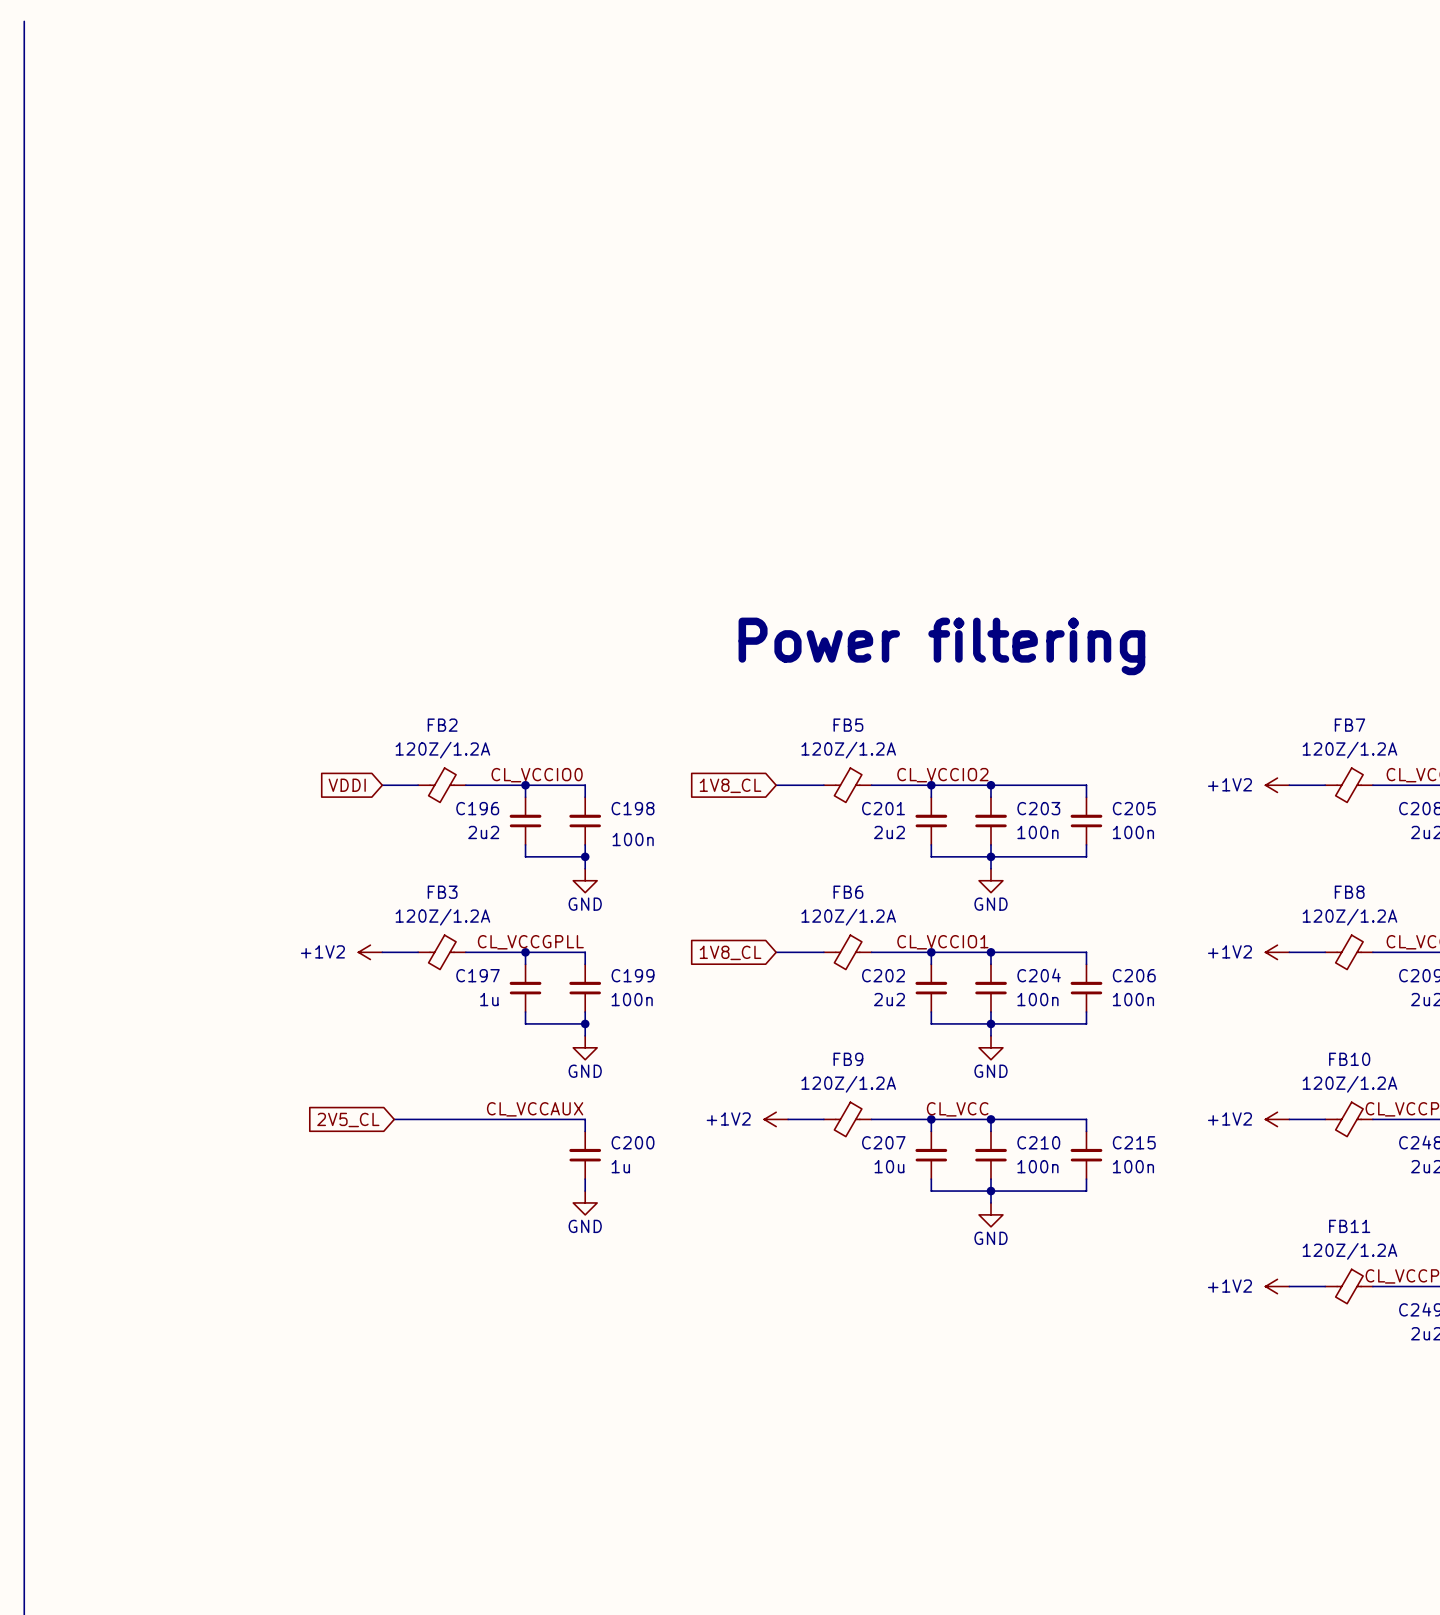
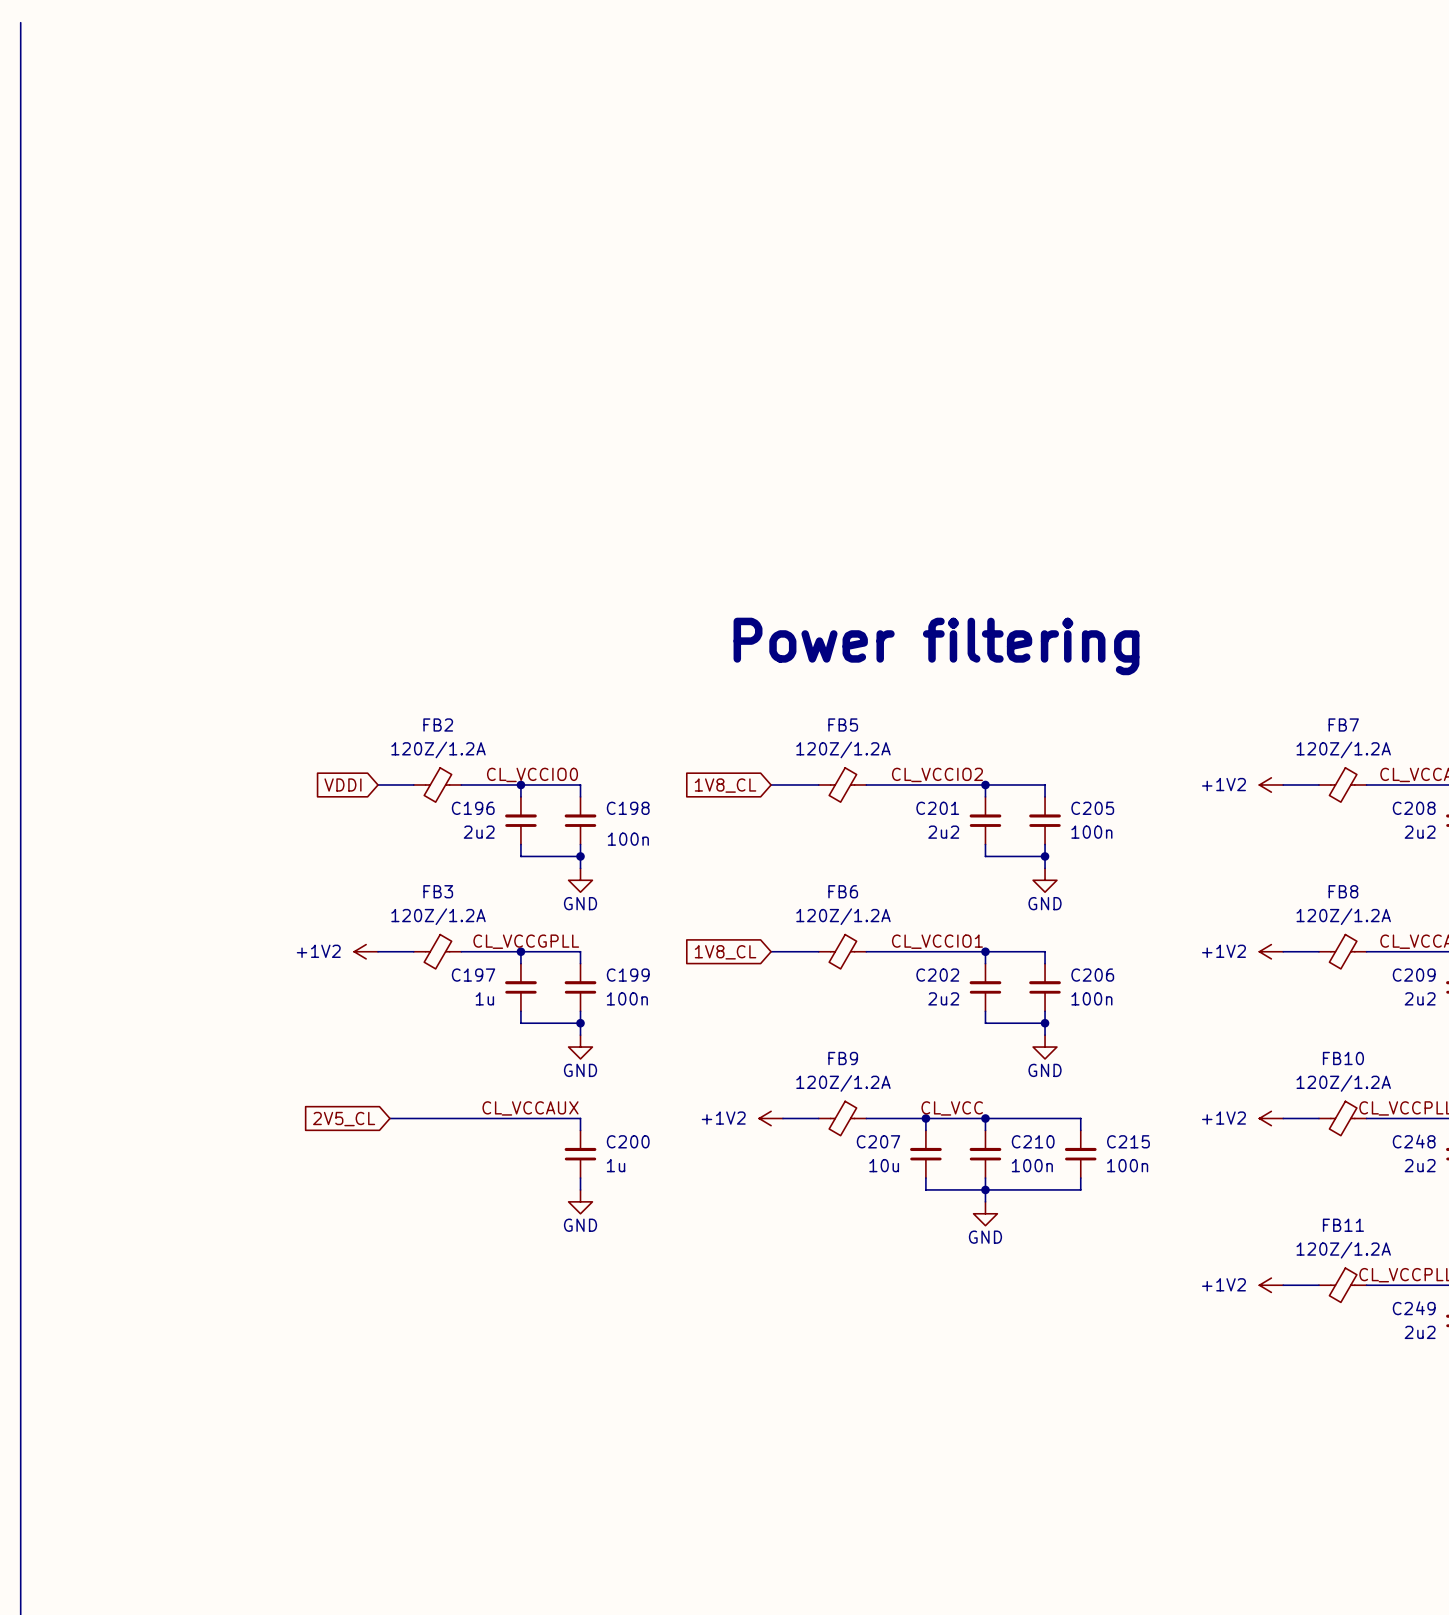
wire: (931, 785) (931, 797) -> none
junction: (931, 785) -> none
wire: (1050, 785) (1086, 785) (1086, 797) -> (1045, 784) (1045, 796)
C203 name: C203 (1038, 808) -> C201 (937, 808)
C201: (931, 821) -> none
C205 position: (1086, 821) -> (1045, 820)
C203 text: 100n (1037, 832) -> 2u2 (943, 832)
wire: (931, 844) (931, 856) (990, 856) (990, 868) -> none
wire: none -> (1045, 844) (1045, 868)
wire: (1086, 844) (1086, 856) (1050, 856) -> none
junction: (990, 856) -> none
junction: none -> (1045, 856)
power symbol position: GND (990, 880) -> GND (1045, 880)
wire: (931, 952) (931, 964) -> none
junction: (931, 952) -> none
wire: (1050, 952) (1086, 952) (1086, 964) -> (1045, 951) (1045, 963)
C204 name: C204 (1039, 975) -> C202 (937, 975)
C202: (931, 988) -> none
C206 position: (1086, 988) -> (1045, 987)
C204 text: 100n (1037, 999) -> 2u2 (943, 998)
wire: (931, 1012) (931, 1023) (990, 1023) (990, 1035) -> none
wire: none -> (1045, 1011) (1045, 1035)
wire: (1086, 1012) (1086, 1023) (1050, 1023) -> none
junction: (990, 1023) -> none
junction: none -> (1045, 1023)
power symbol position: GND (990, 1047) -> GND (1045, 1047)

